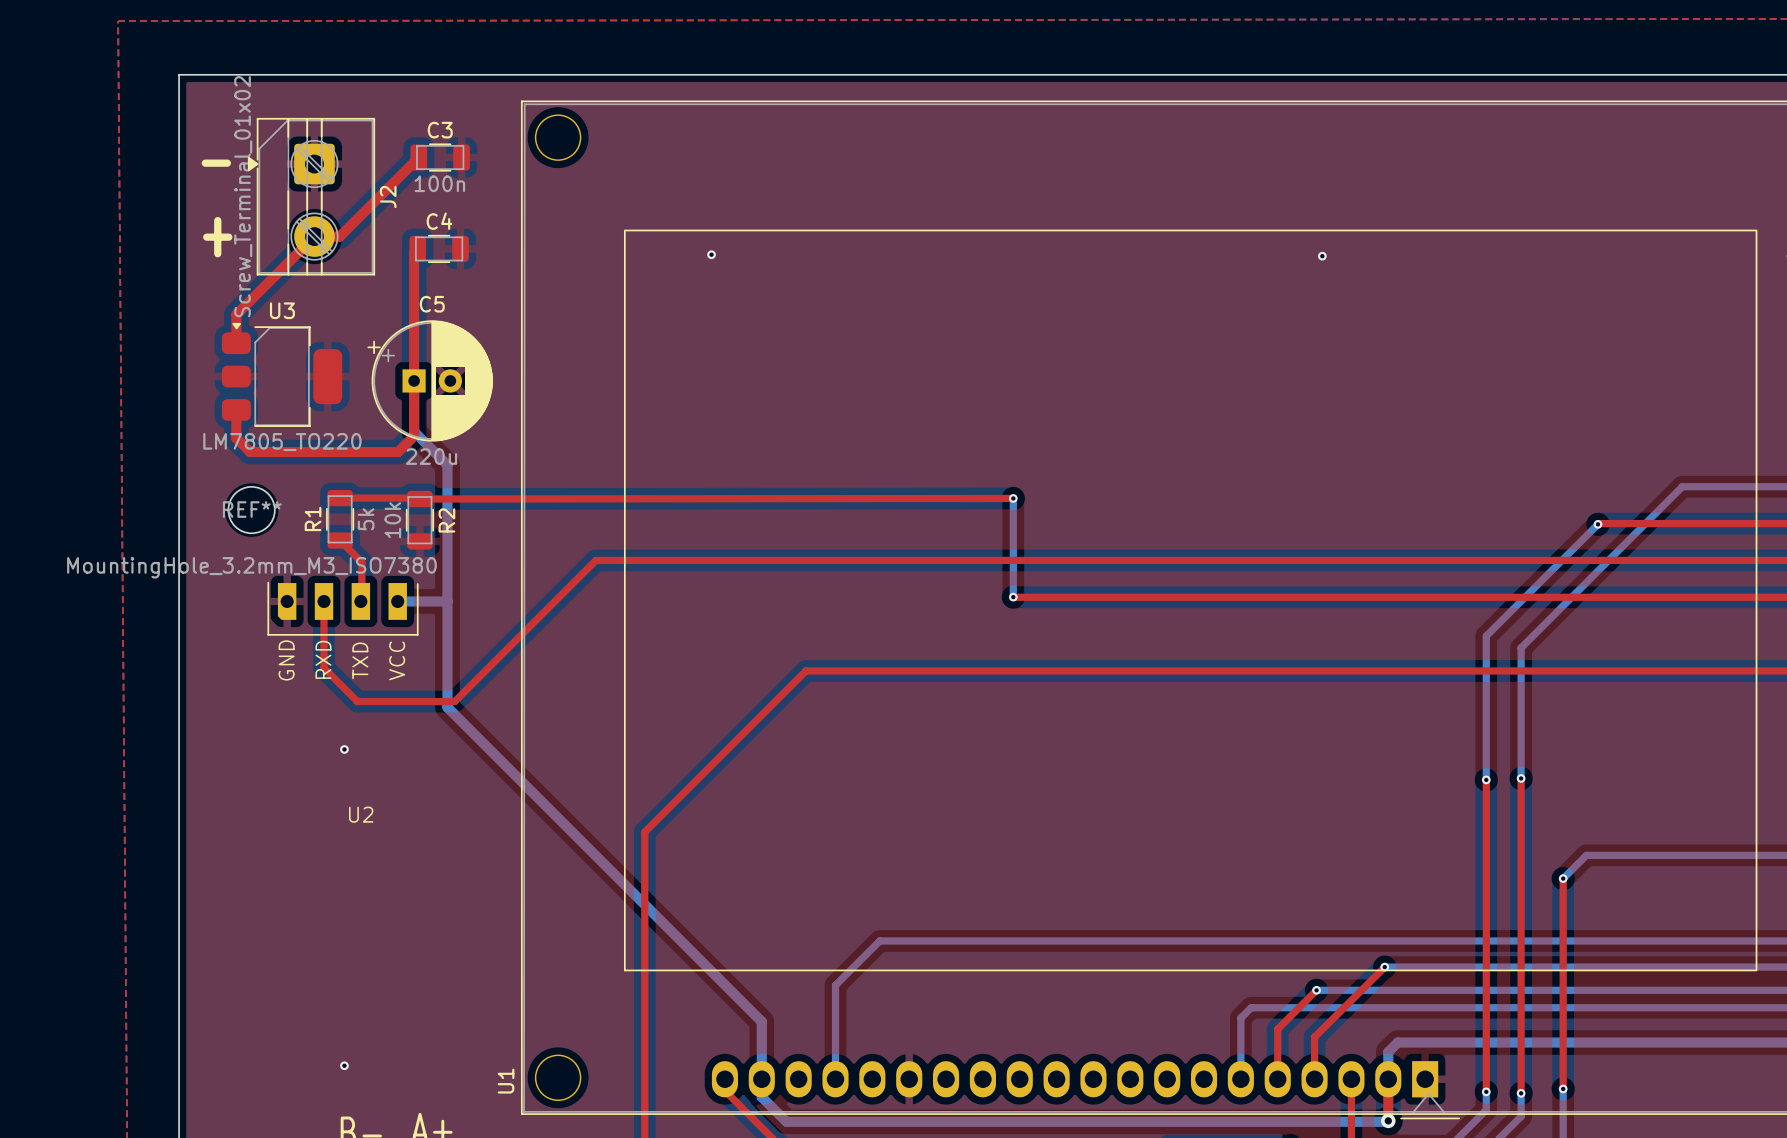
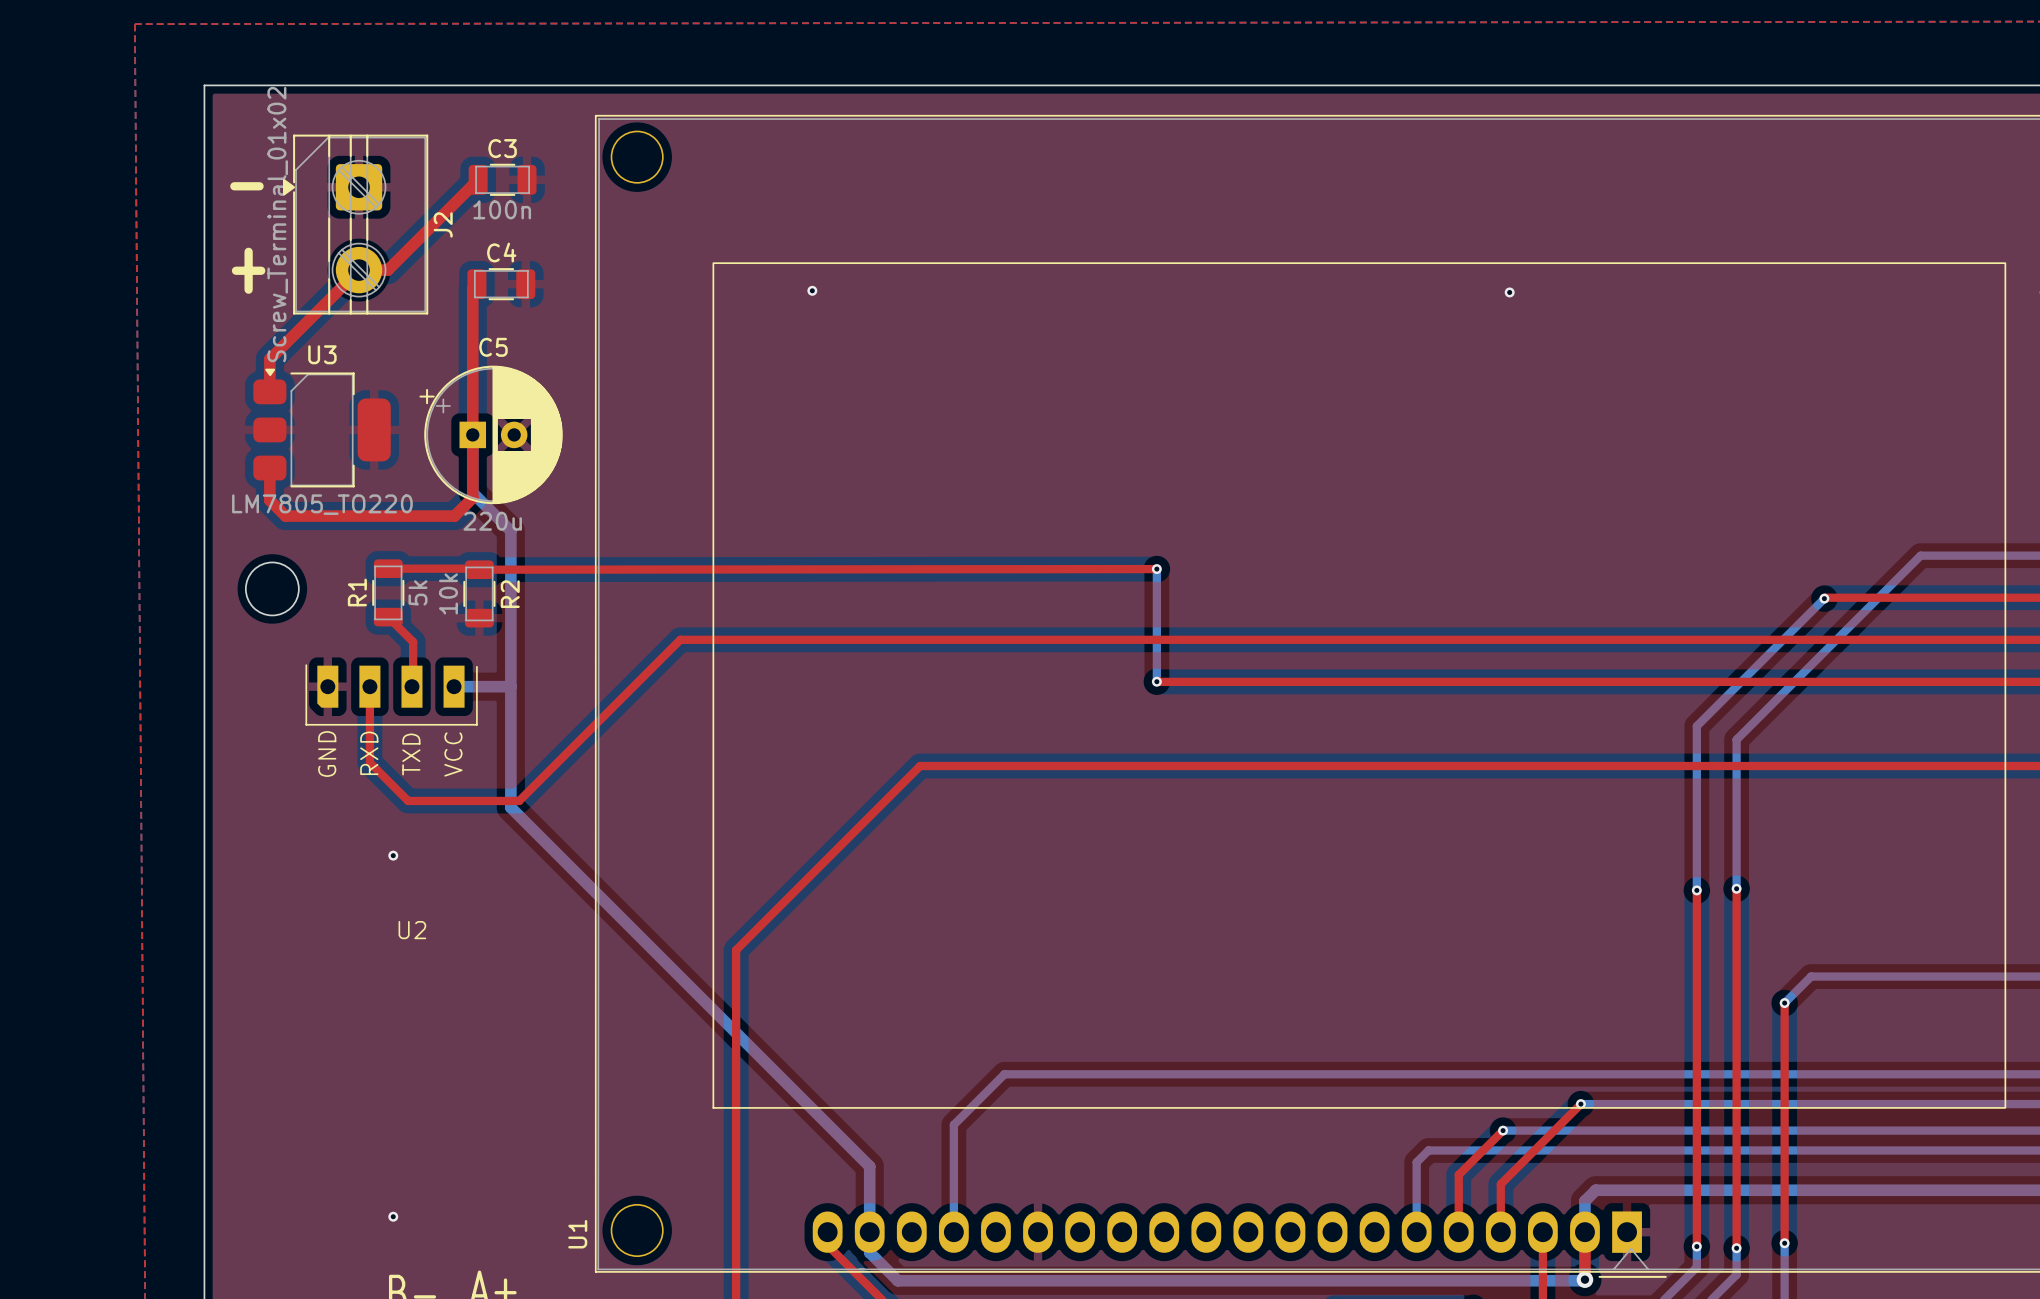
round board edge: none -> [245, 562, 300, 616]
REF**: MountingHole_3.2mm_M3_ISO7380 (251, 510) -> none

